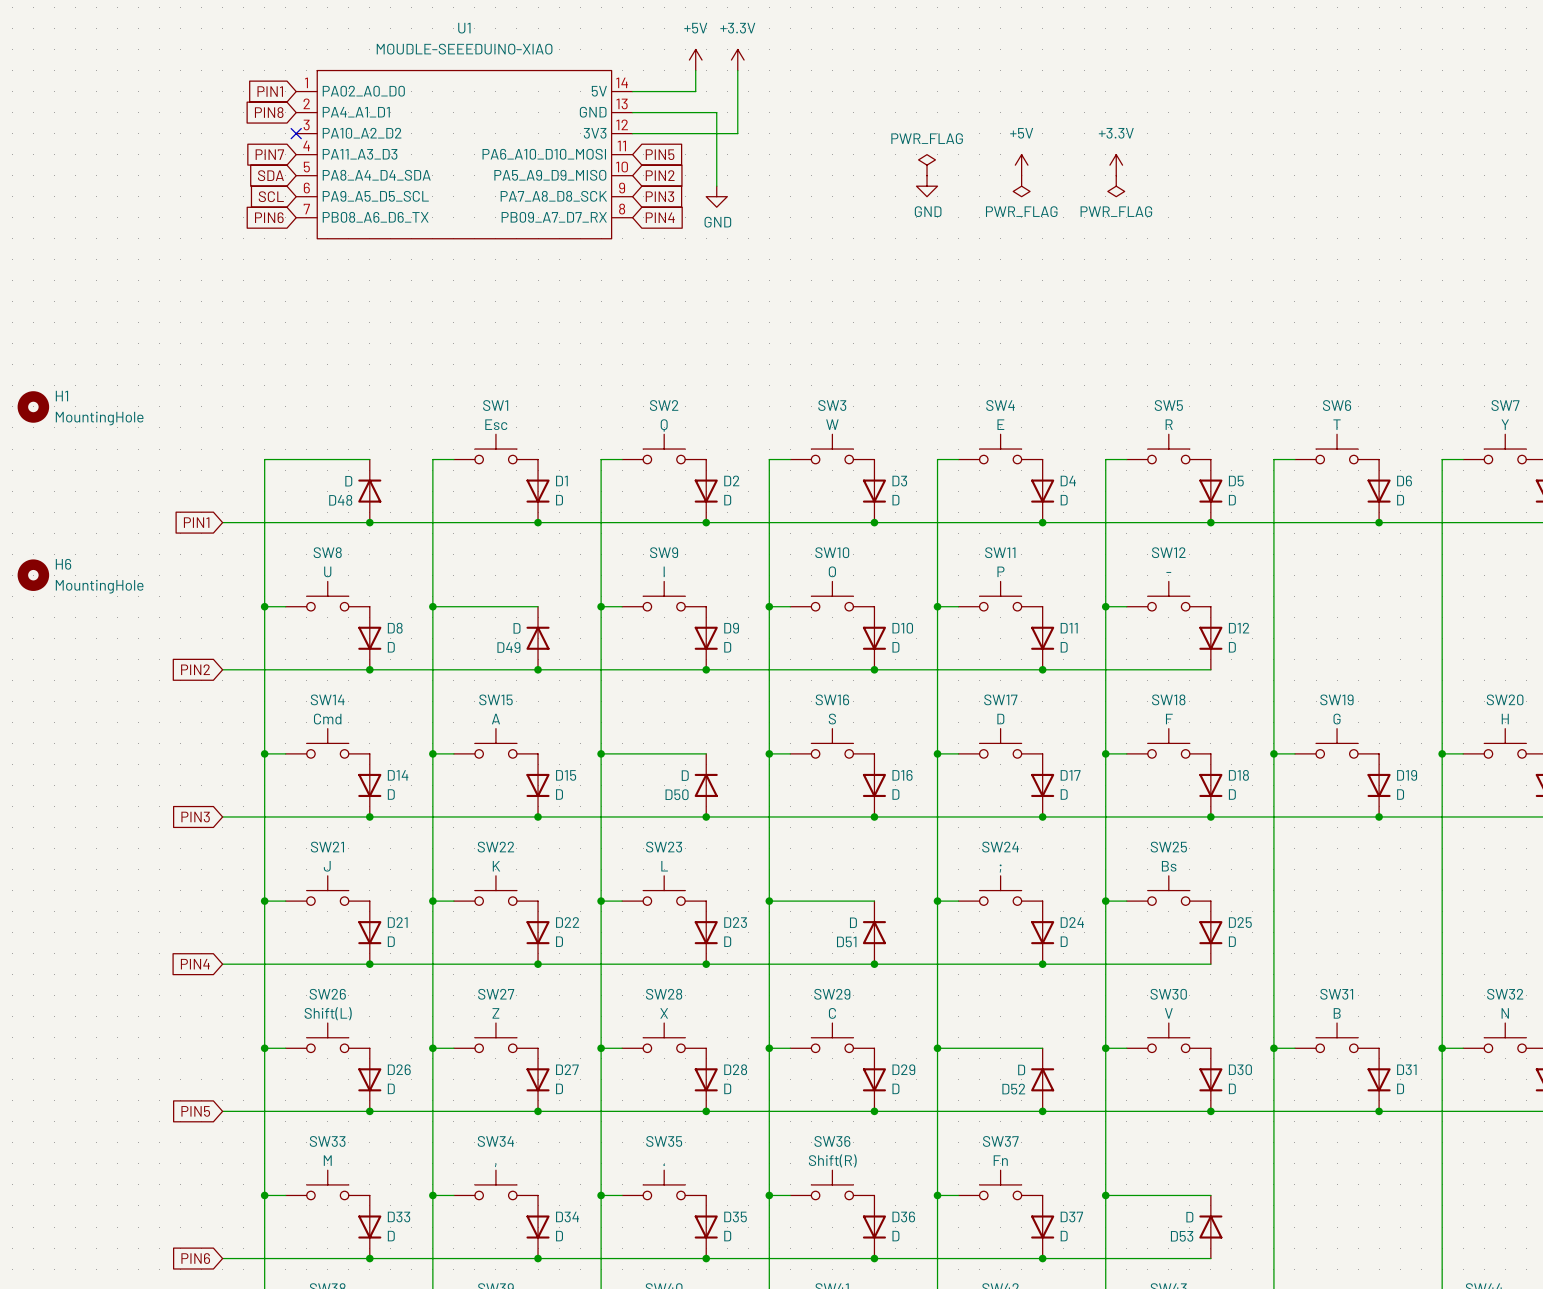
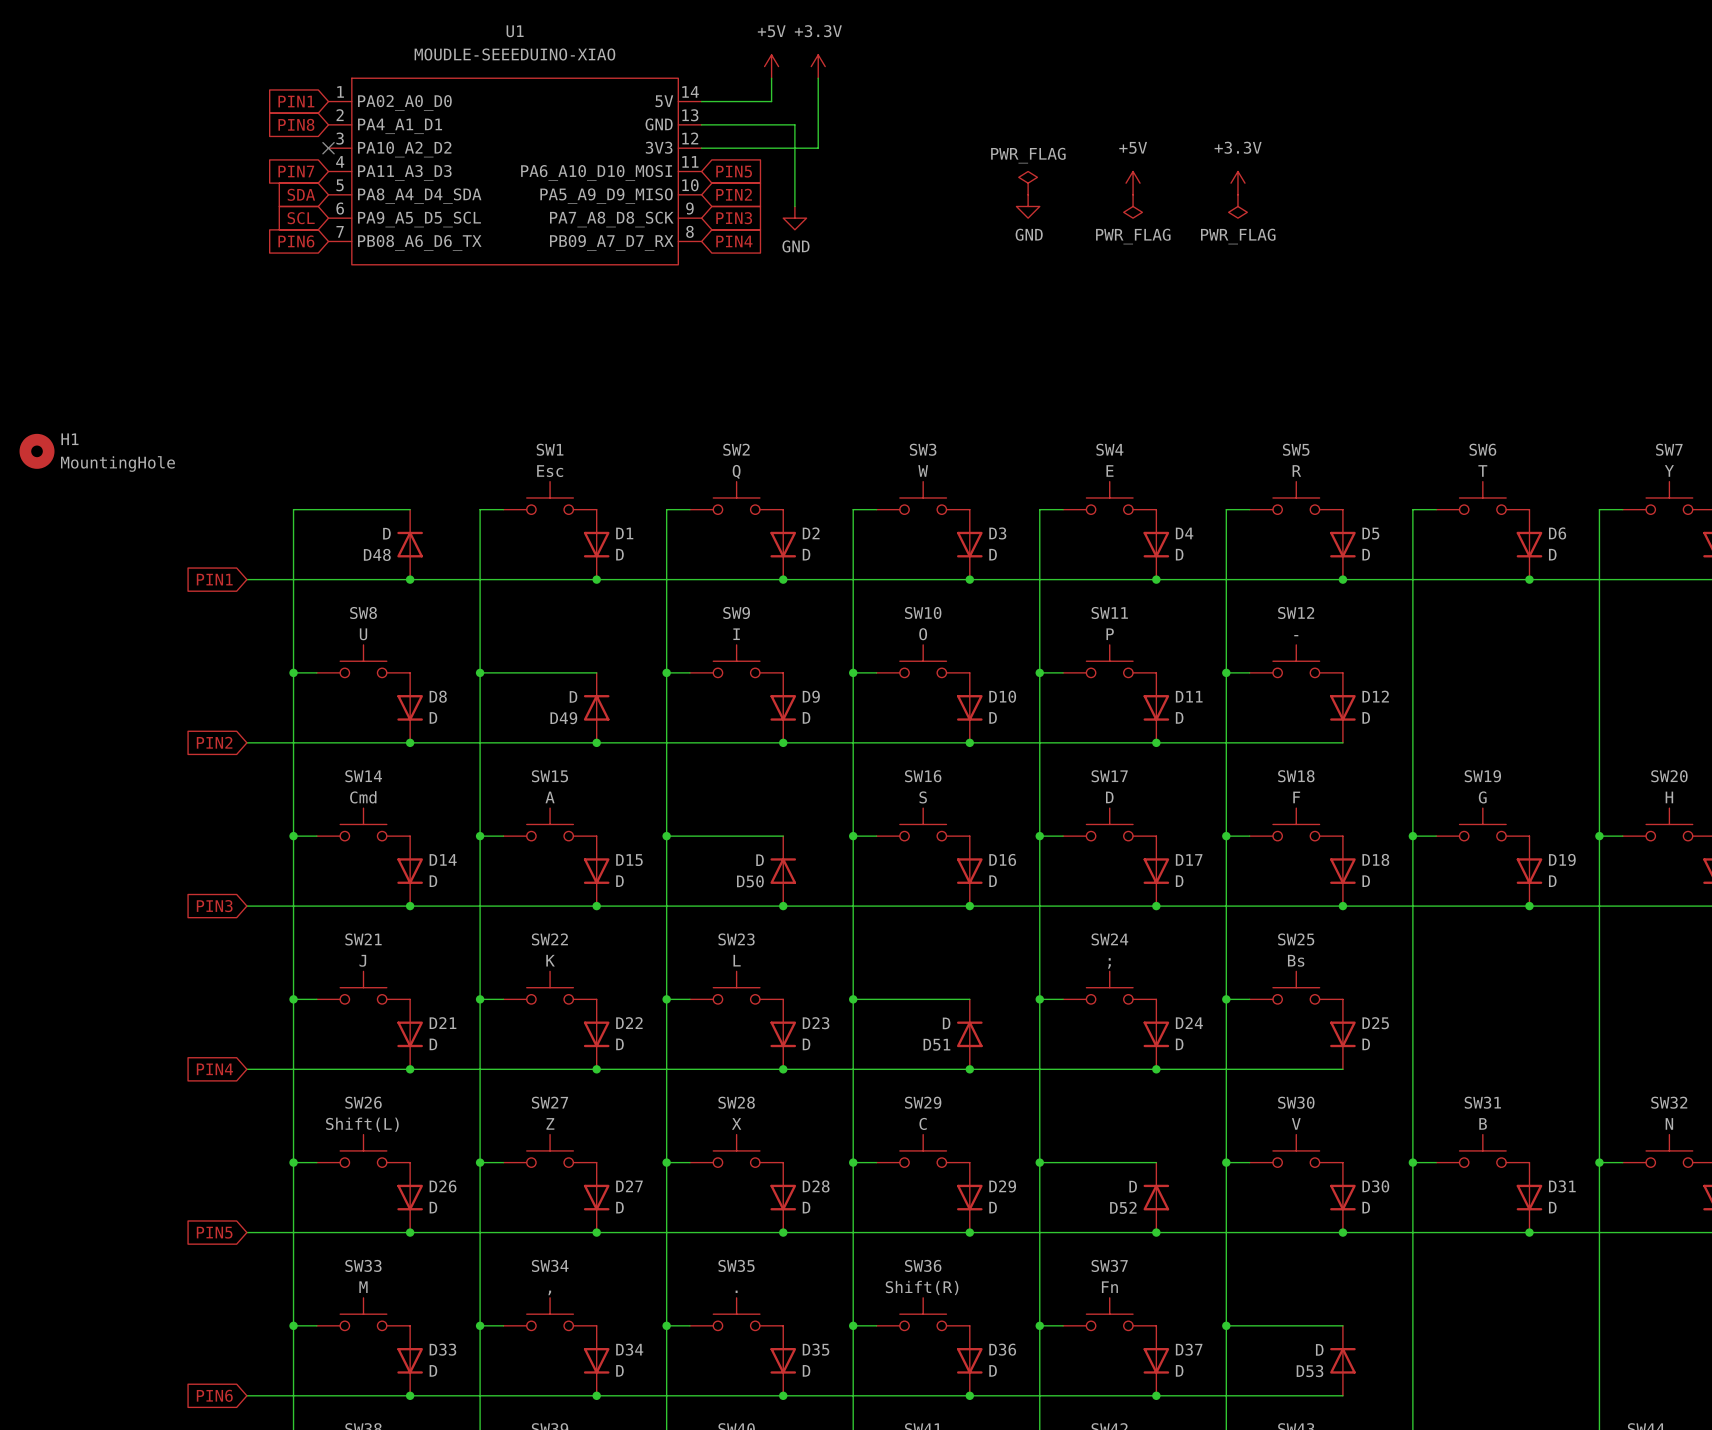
H6: MountingHole (33, 575) -> none

